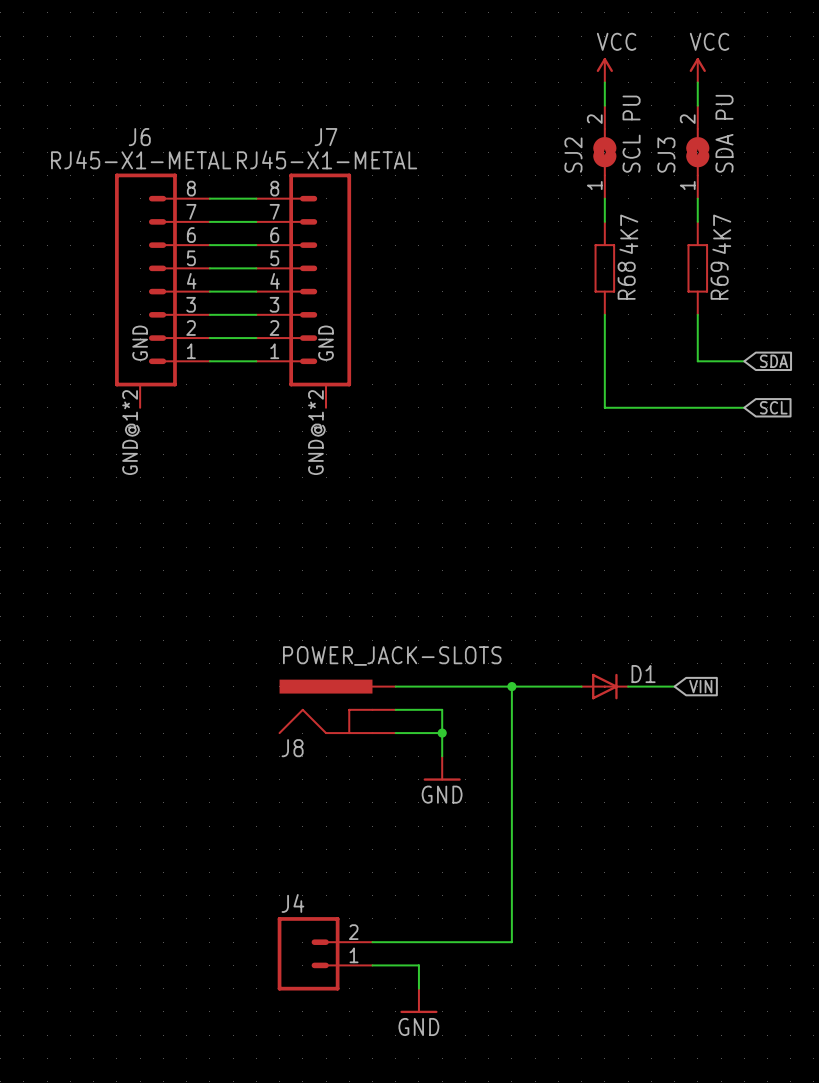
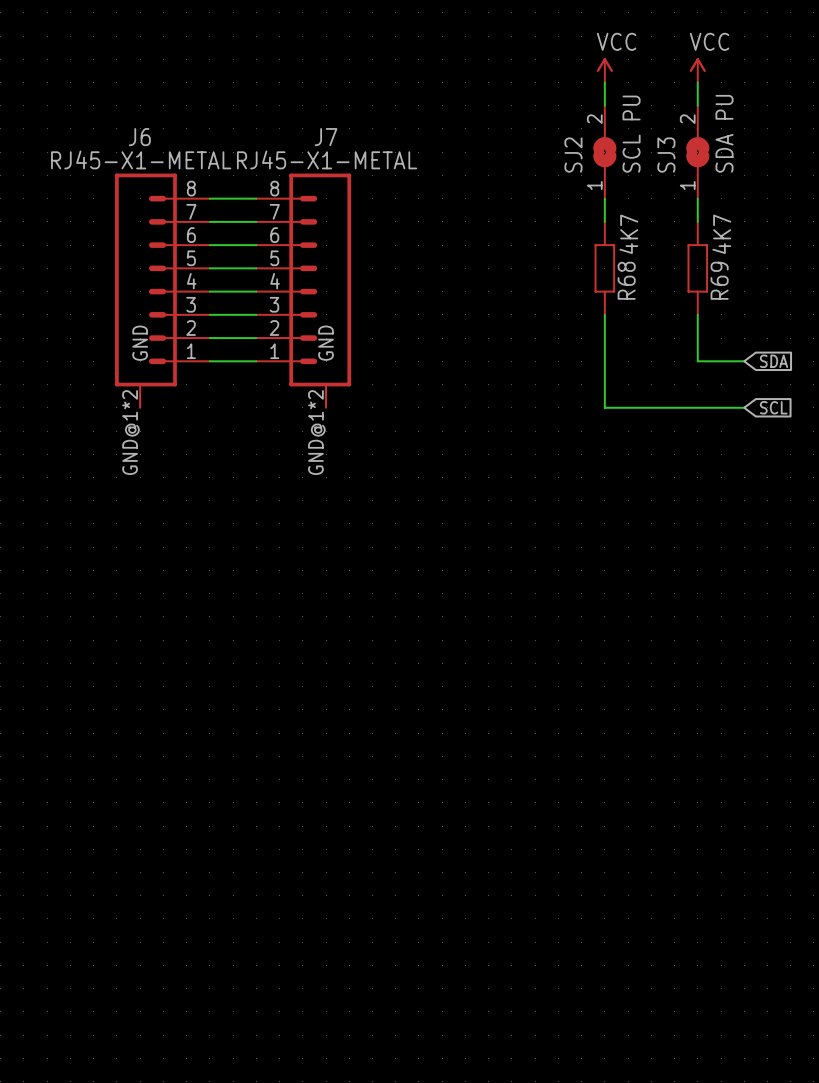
wire: (395, 686) (581, 686) -> none
wire: (511, 686) (511, 942) (372, 942) -> none
junction: (511, 686) -> none
D1: (604, 686) -> none
wire: (628, 686) (674, 686) -> none
global label: VIN (700, 686) -> none
J8: POWER_JACK-SLOTS (337, 706) -> none
wire: (395, 709) (442, 709) (442, 756) -> none
wire: (395, 733) (442, 733) -> none
junction: (442, 733) -> none
power symbol: GND (442, 768) -> none
J4: (325, 953) -> none
wire: (372, 965) (418, 965) (418, 988) -> none
power symbol: GND (418, 1000) -> none

